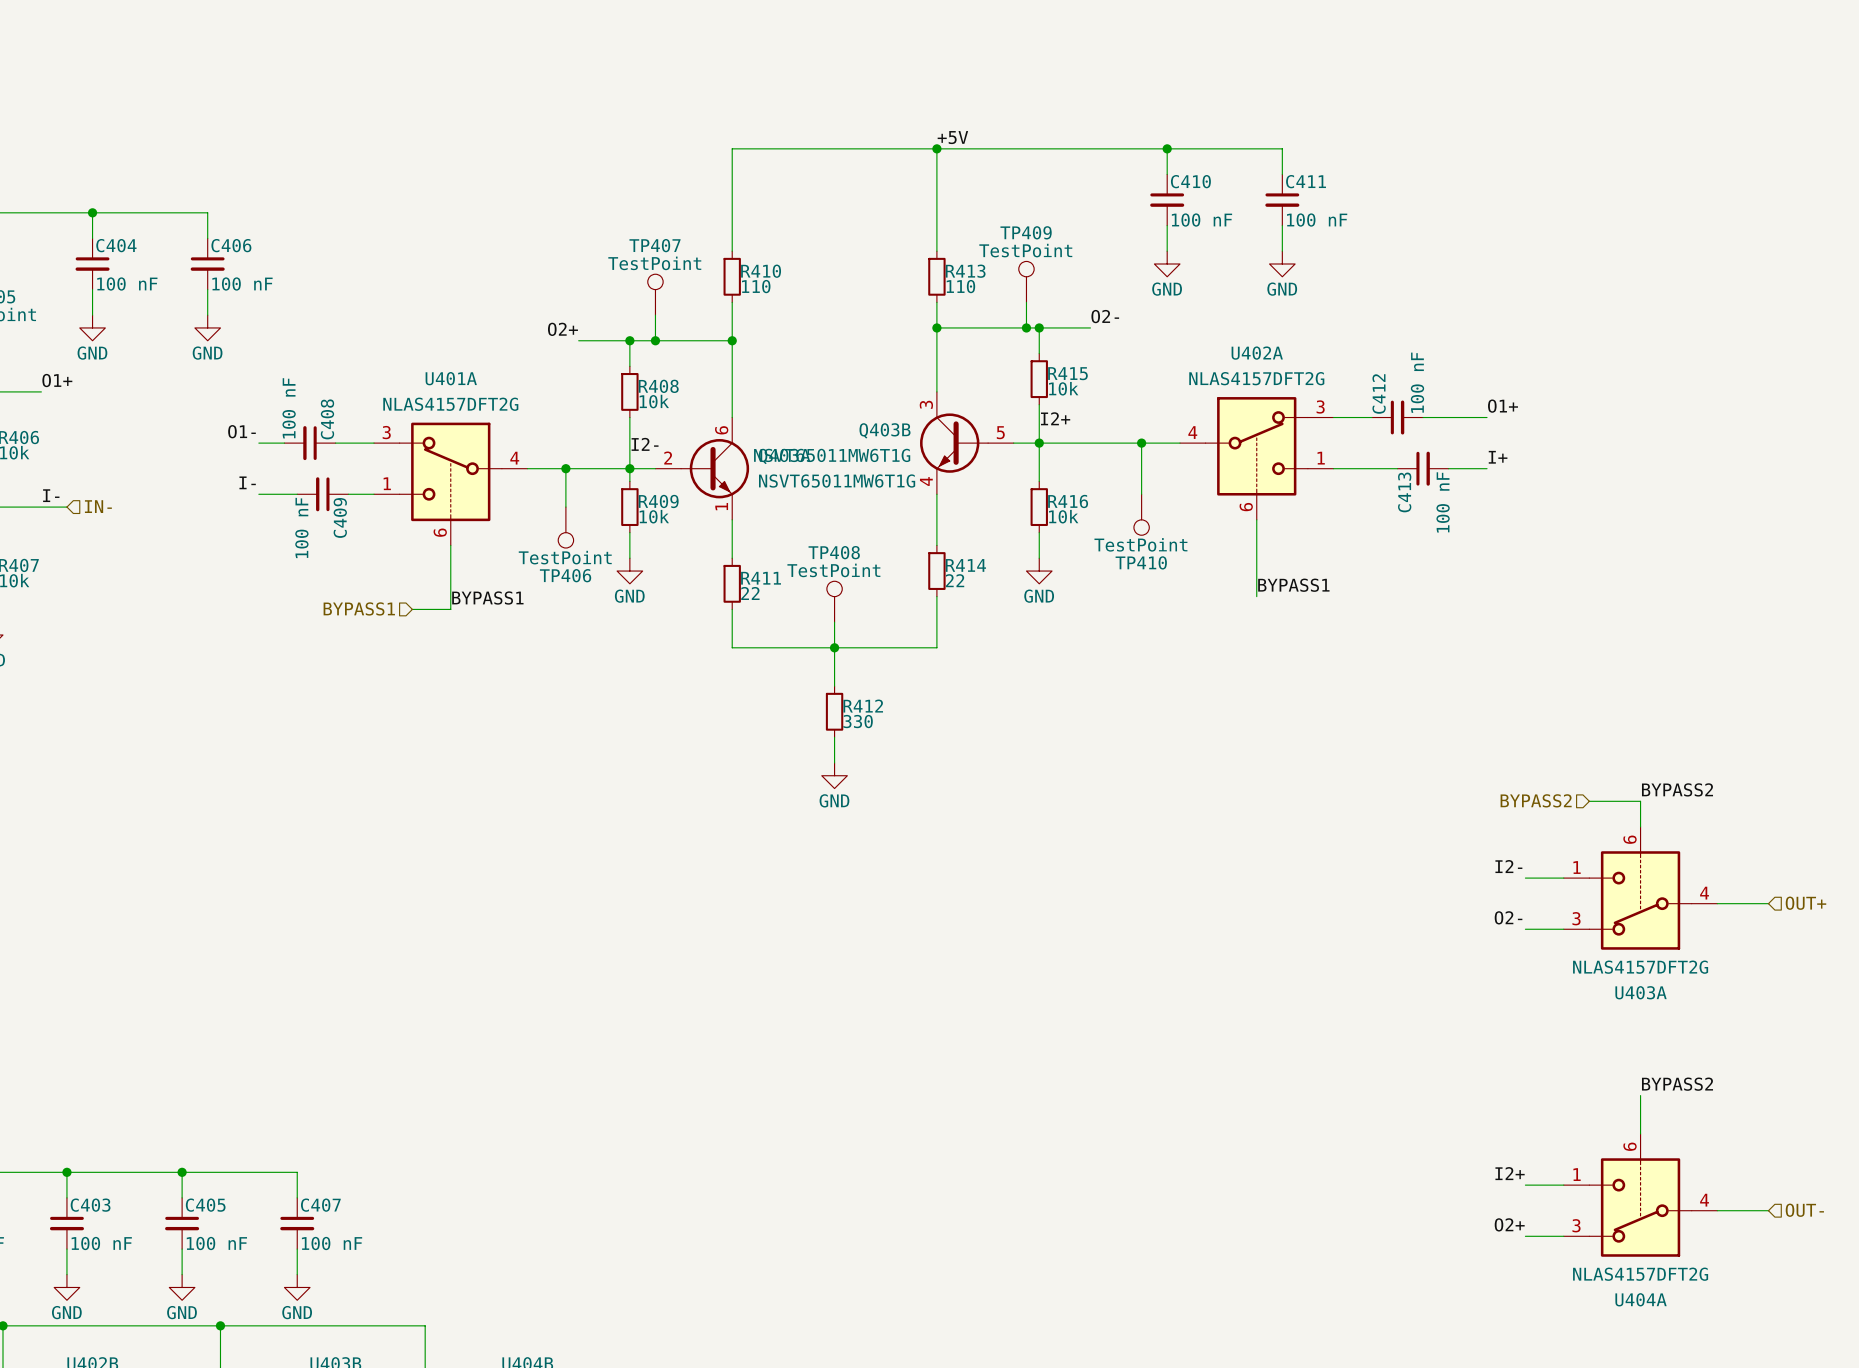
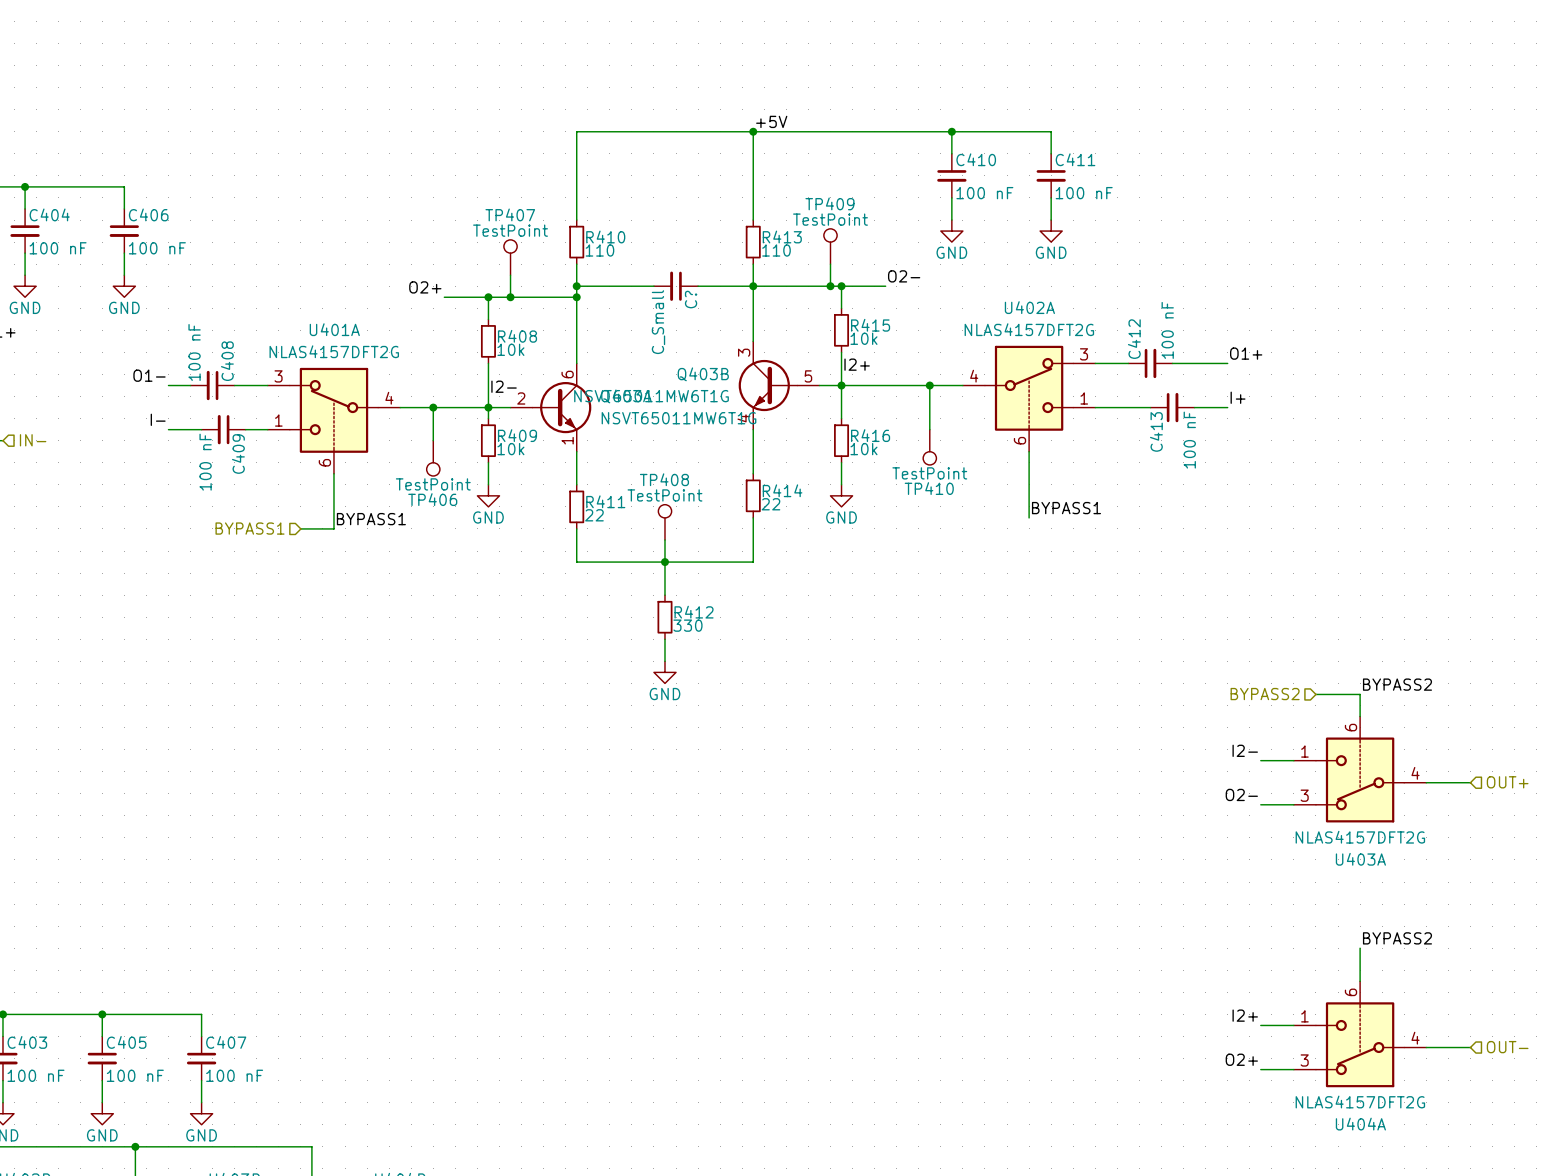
wire: none -> (576, 286) (653, 286)
junction: none -> (576, 286)
C?: none -> C_Small (676, 286)
wire: none -> (698, 286) (753, 286)

